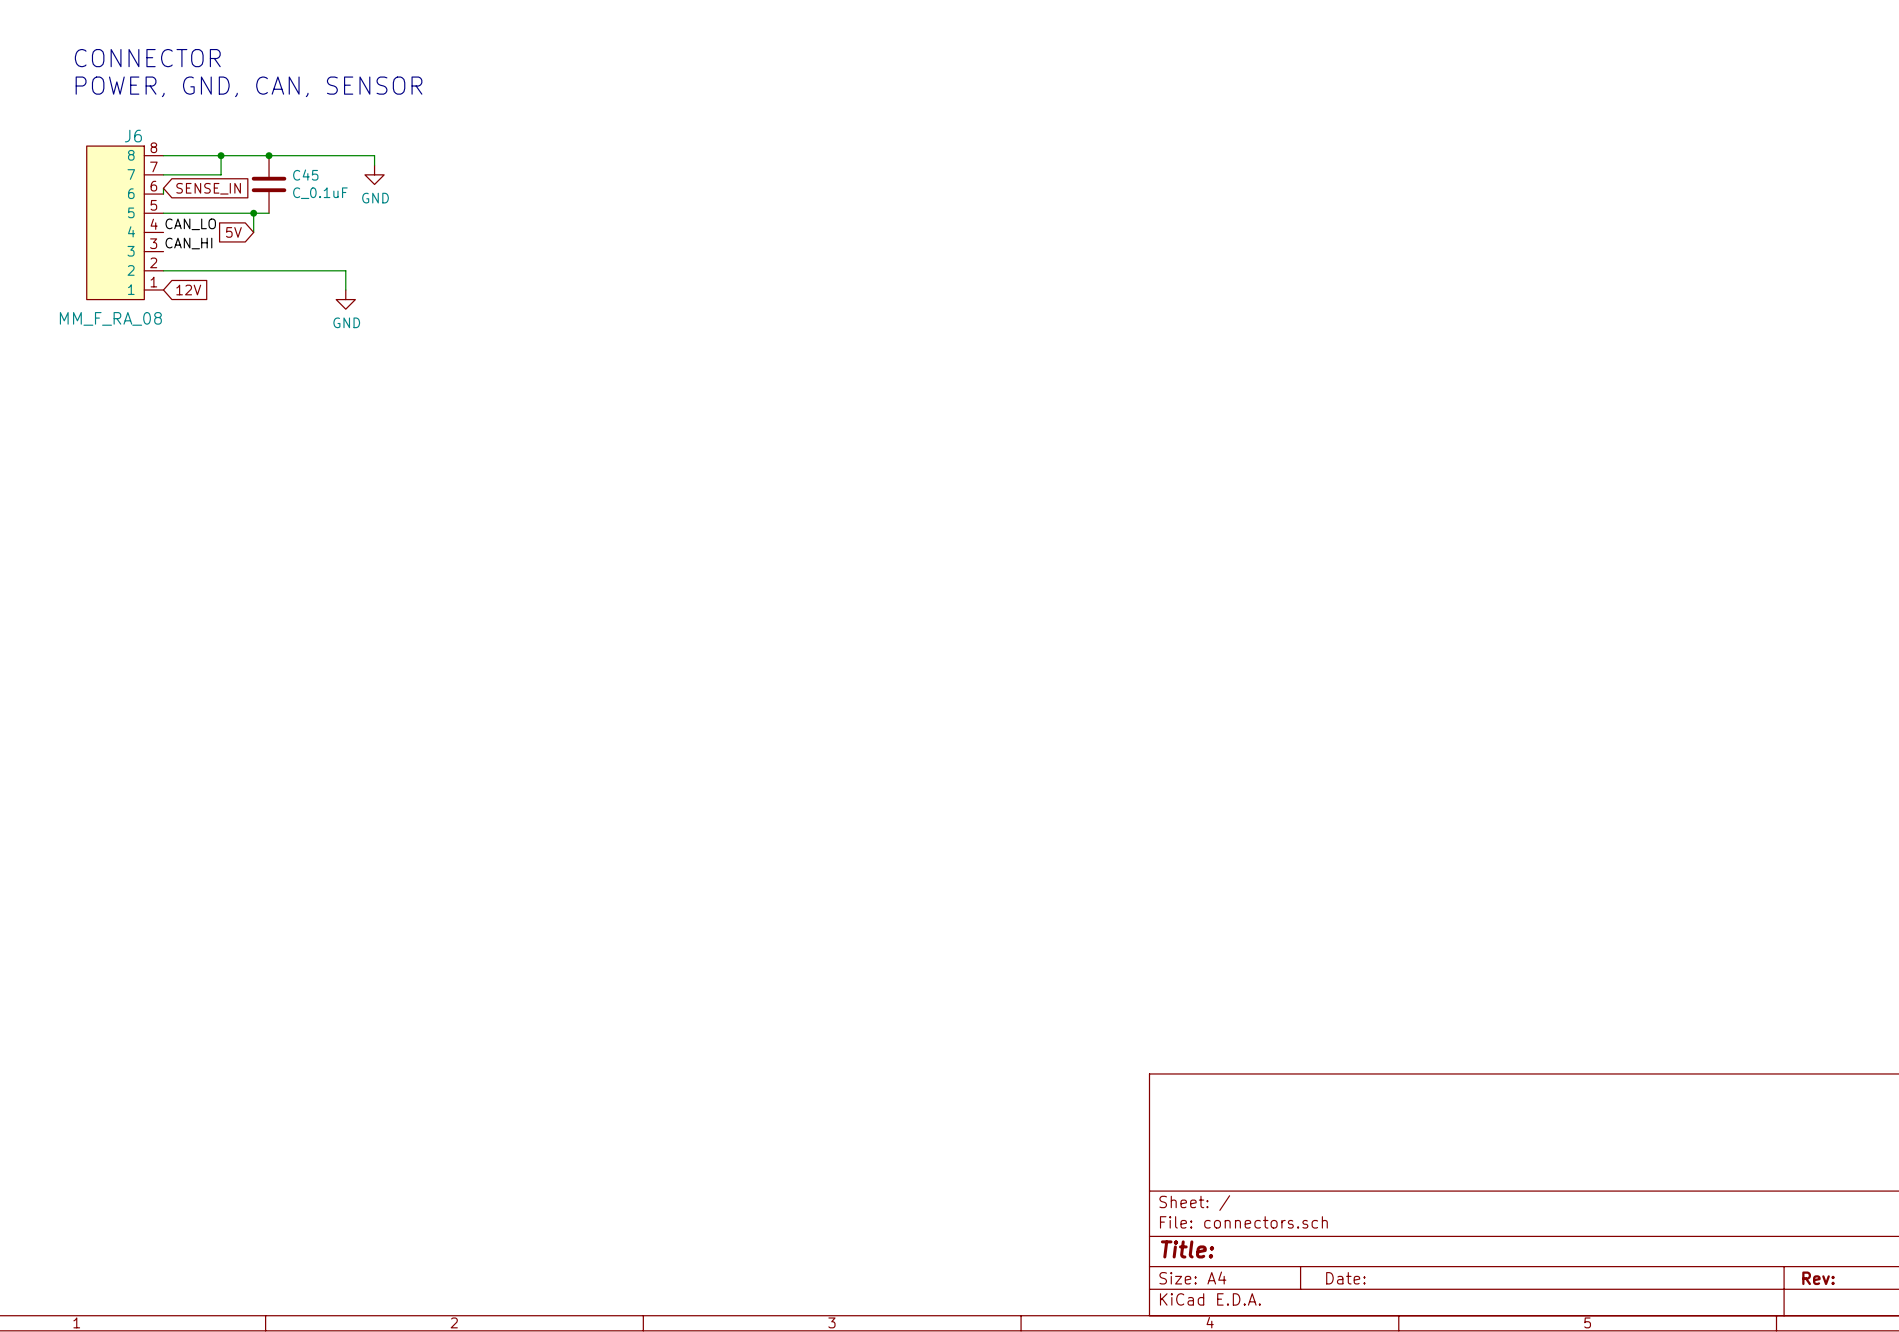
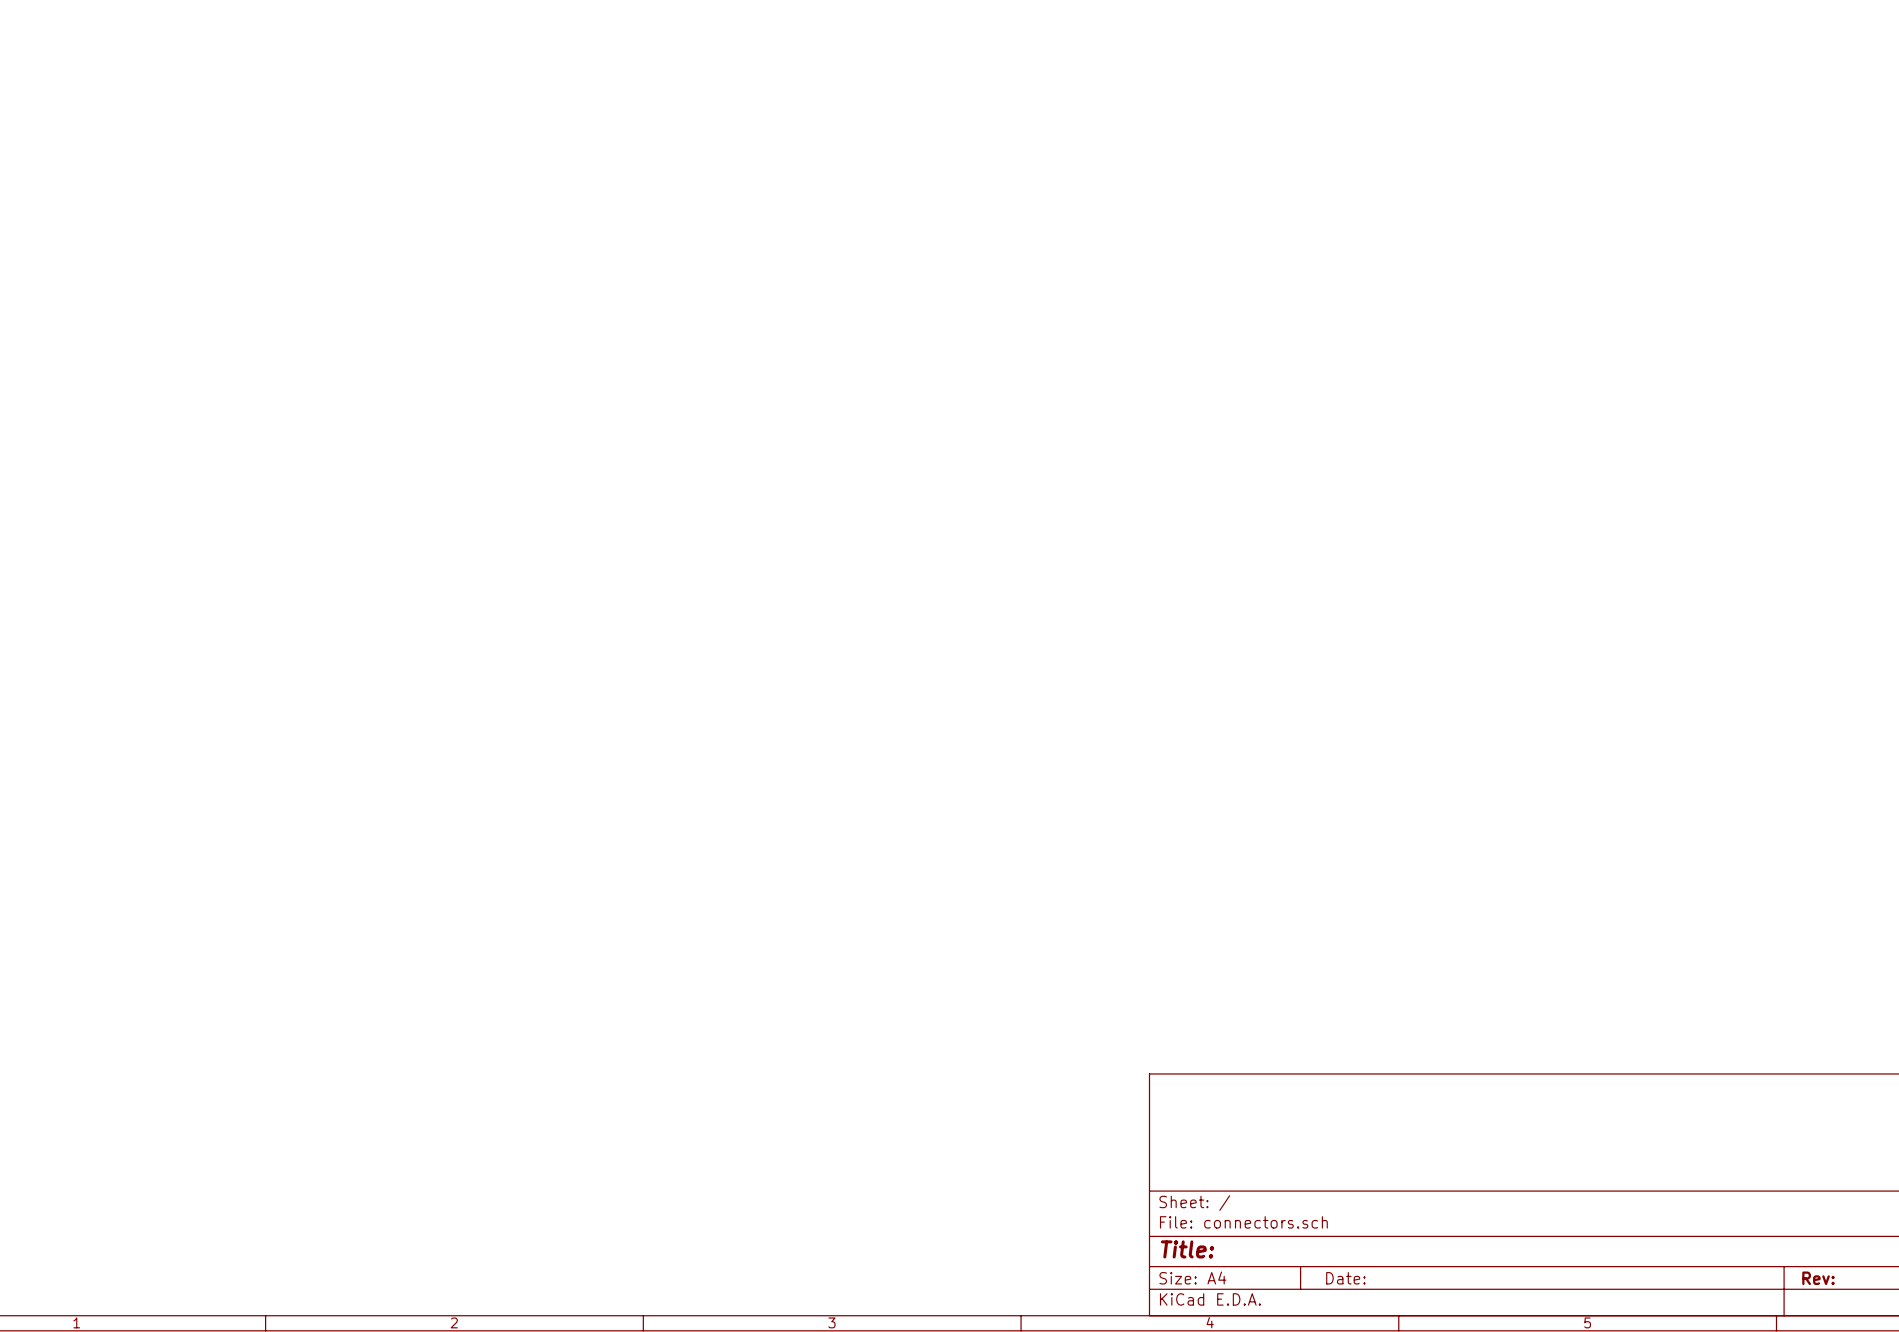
text: CONNECTOR (147, 58) -> none
text: POWER, GND, CAN, SENSOR (249, 86) -> none
wire: (163, 155) (374, 155) (374, 165) -> none
wire: (221, 155) (221, 174) (163, 174) -> none
junction: (221, 155) -> none
junction: (269, 155) -> none
power symbol: GND (374, 174) -> none
C45: C_0.1uF (269, 184) -> none
wire: (163, 188) (163, 194) -> none
global label: SENSE_IN (208, 188) -> none
wire: (163, 213) (269, 213) -> none
wire: (253, 213) (253, 232) -> none
junction: (253, 213) -> none
J6: MM_F_RA_08 (125, 222) -> none
label: CAN_LO (190, 224) -> none
global label: 5V (233, 232) -> none
label: CAN_HI (188, 243) -> none
wire: (163, 270) (345, 270) (345, 290) -> none
global label: 12V (188, 290) -> none
power symbol: GND (345, 299) -> none

